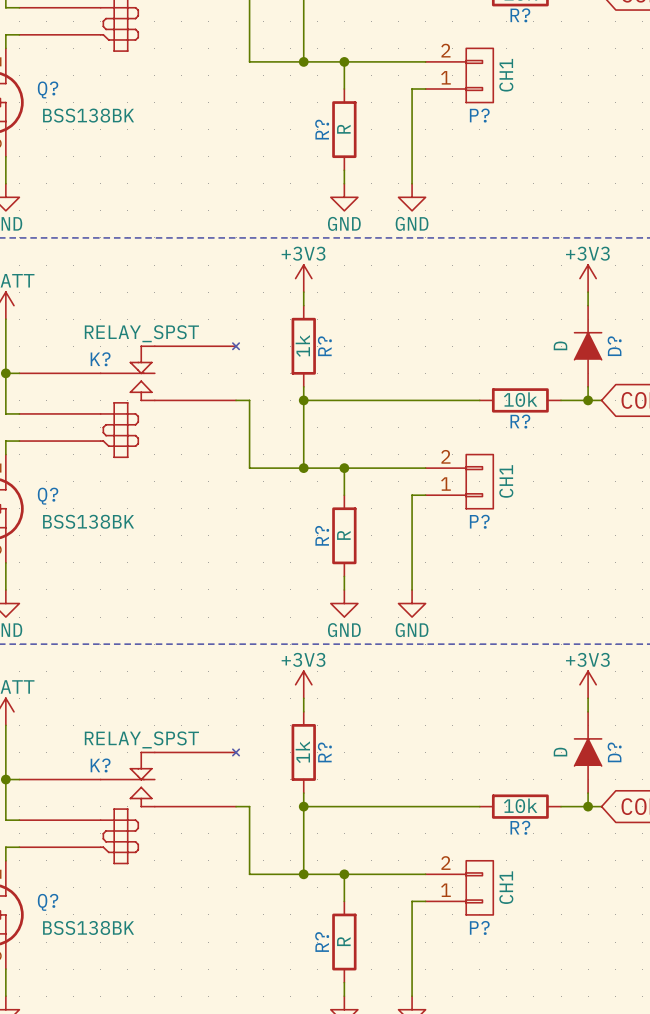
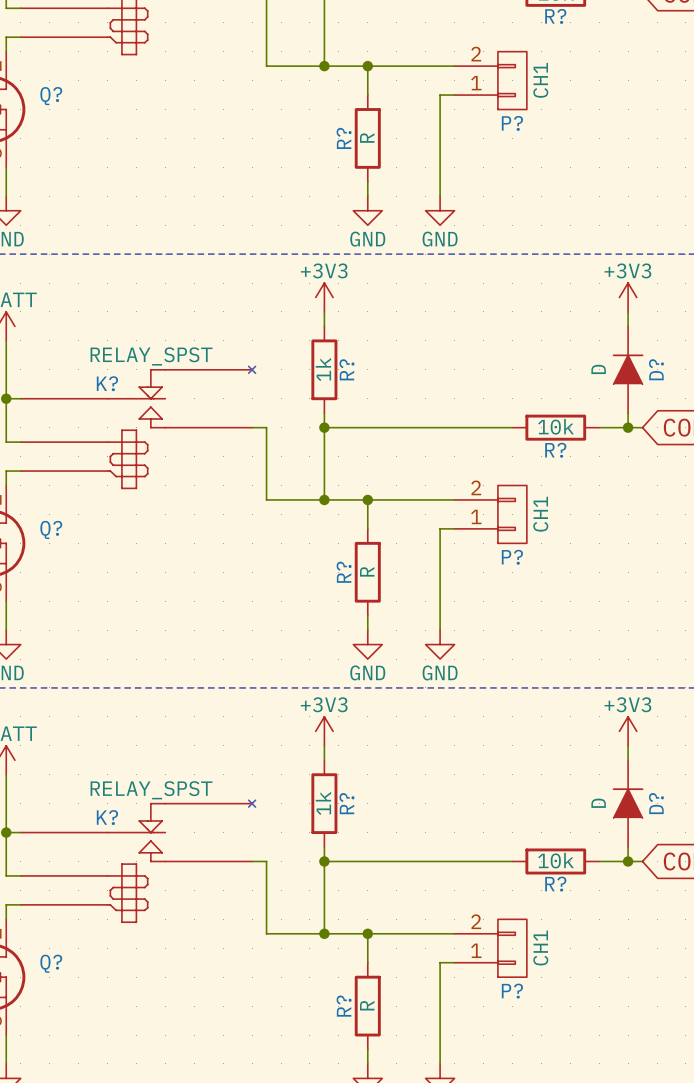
Q? value: BSS138BK (88, 115) -> none
Q? value: BSS138BK (88, 521) -> none
Q? value: BSS138BK (88, 927) -> none

